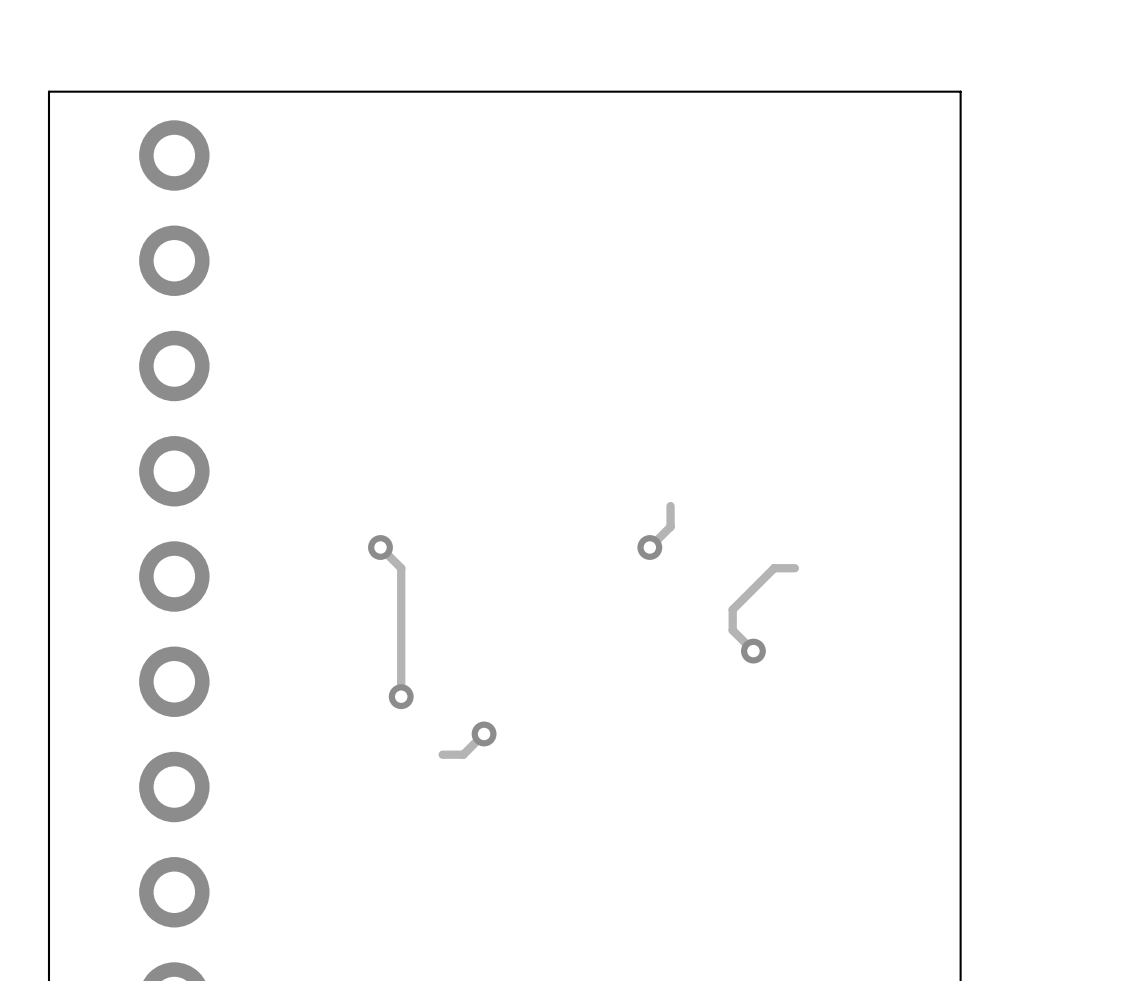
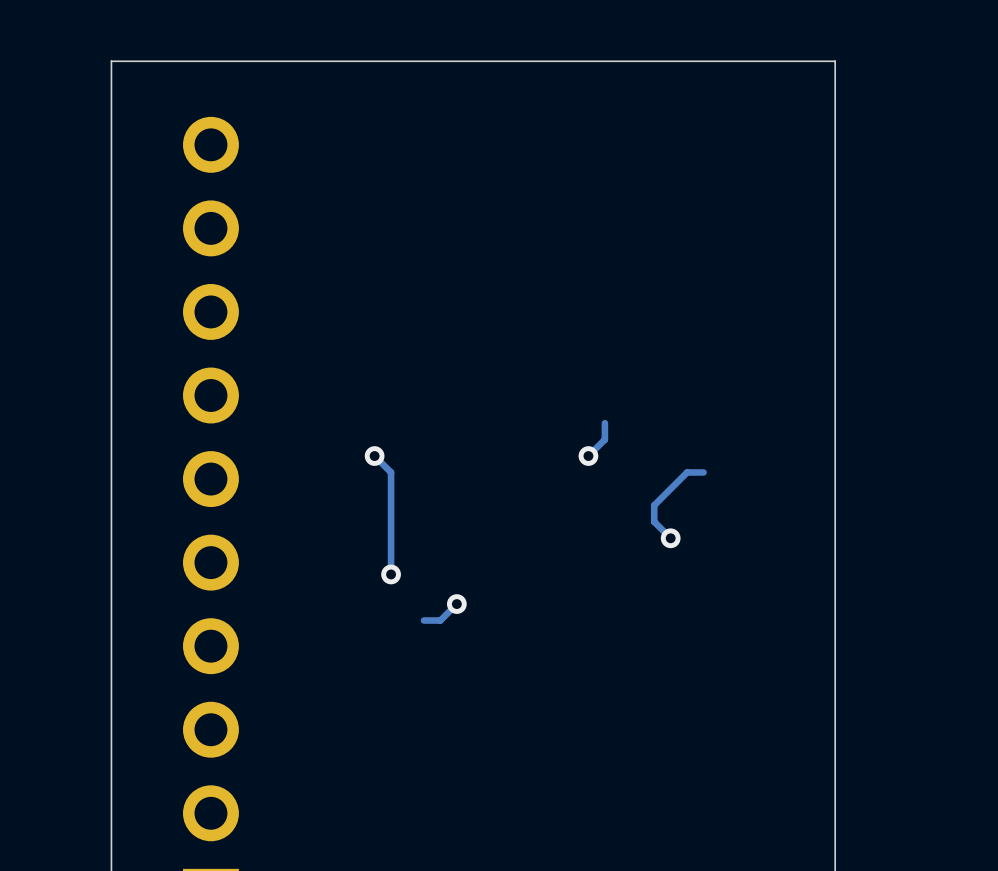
board edge: (960, 91) (48, 91) -> (835, 94) (835, 61) (111, 61) (111, 94)

